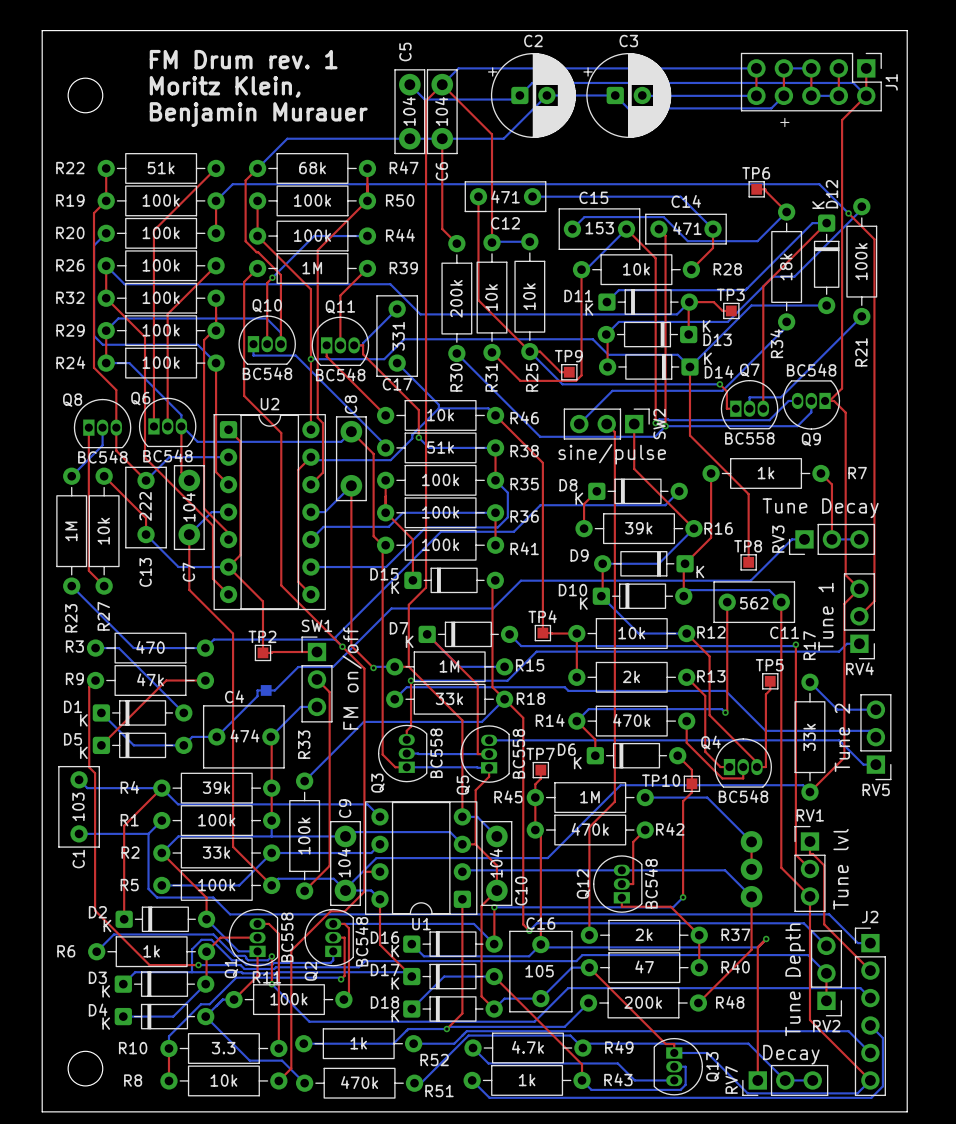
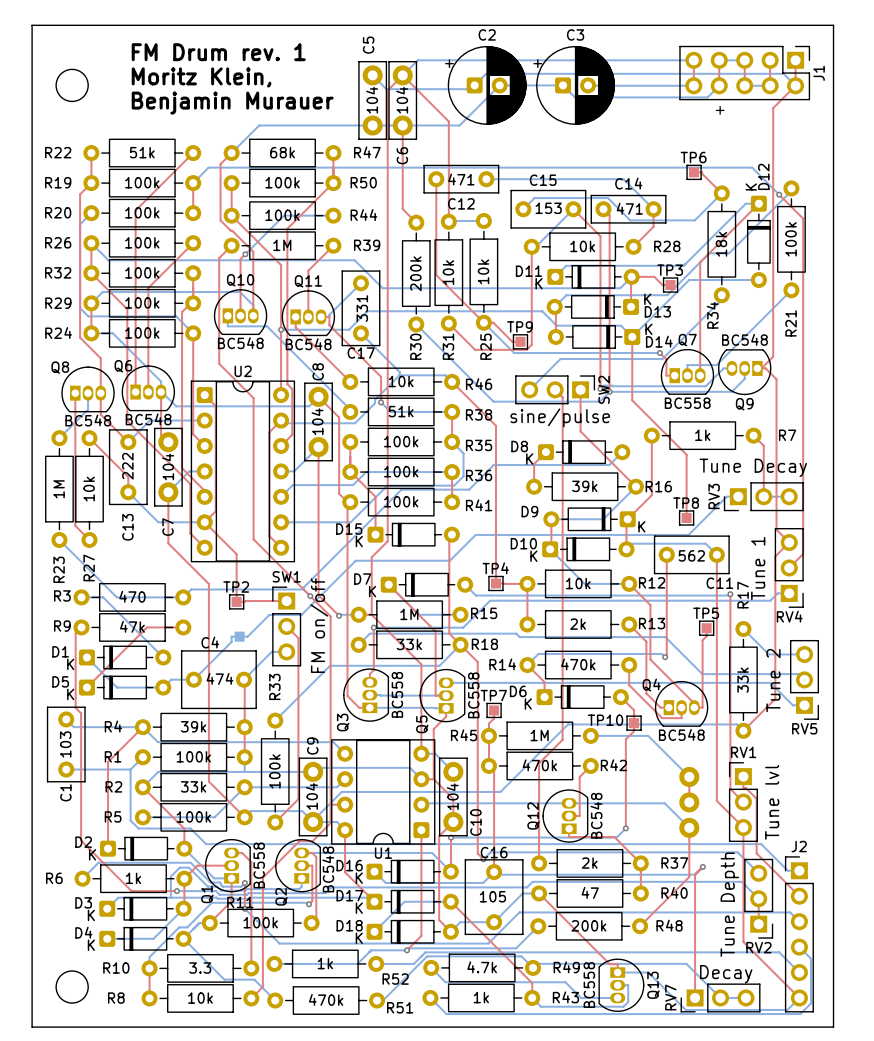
C8 value: none -> 104 (317, 421)
Q13 value: none -> BC558 (589, 985)

